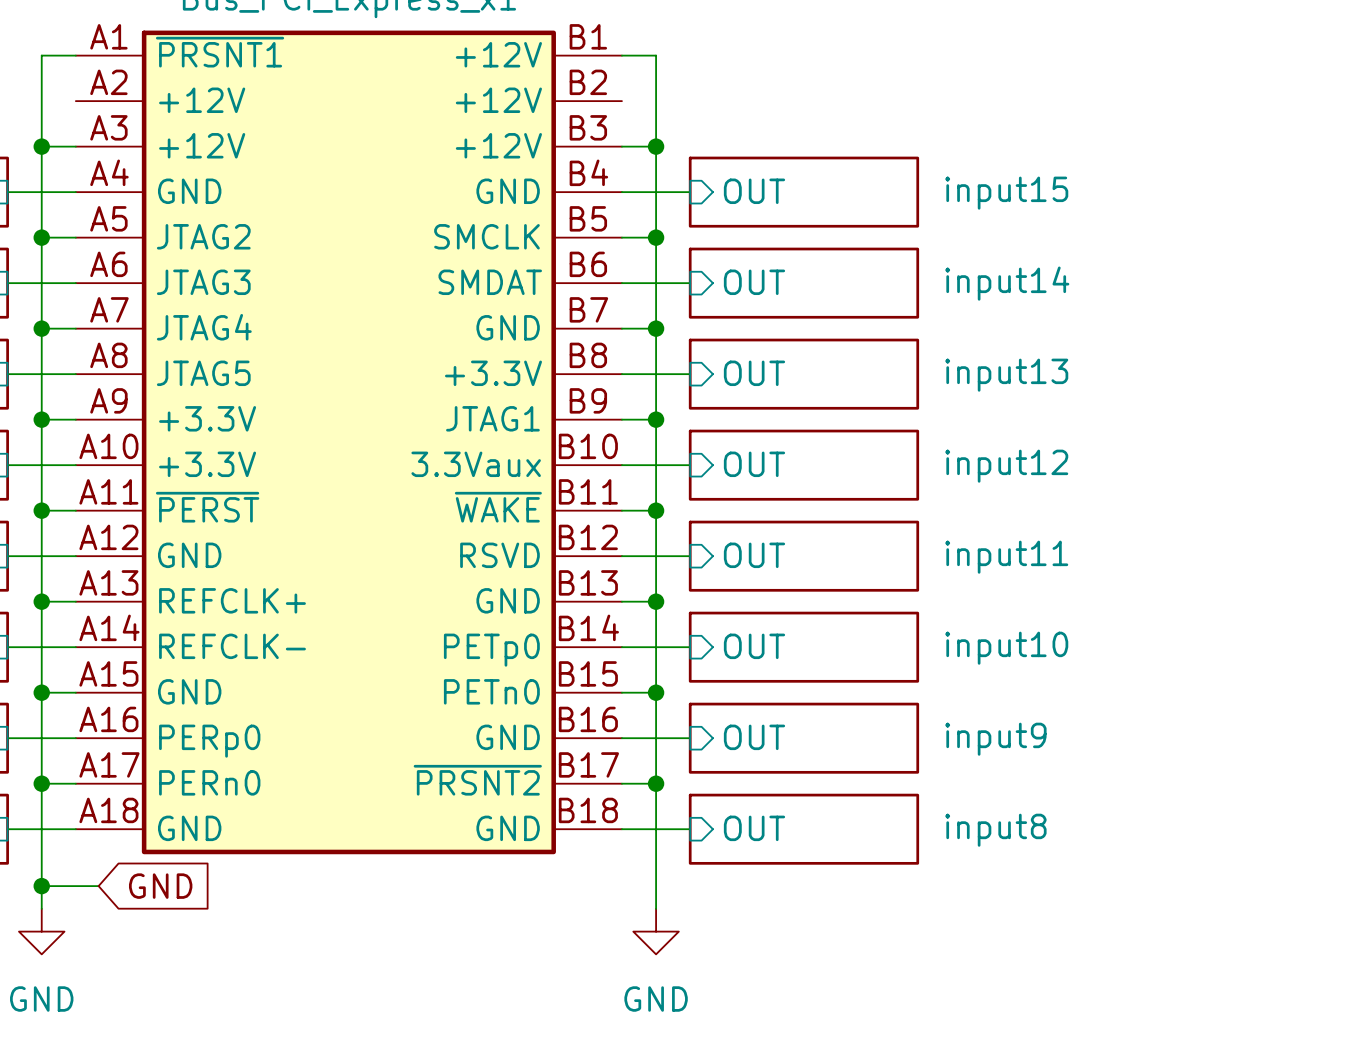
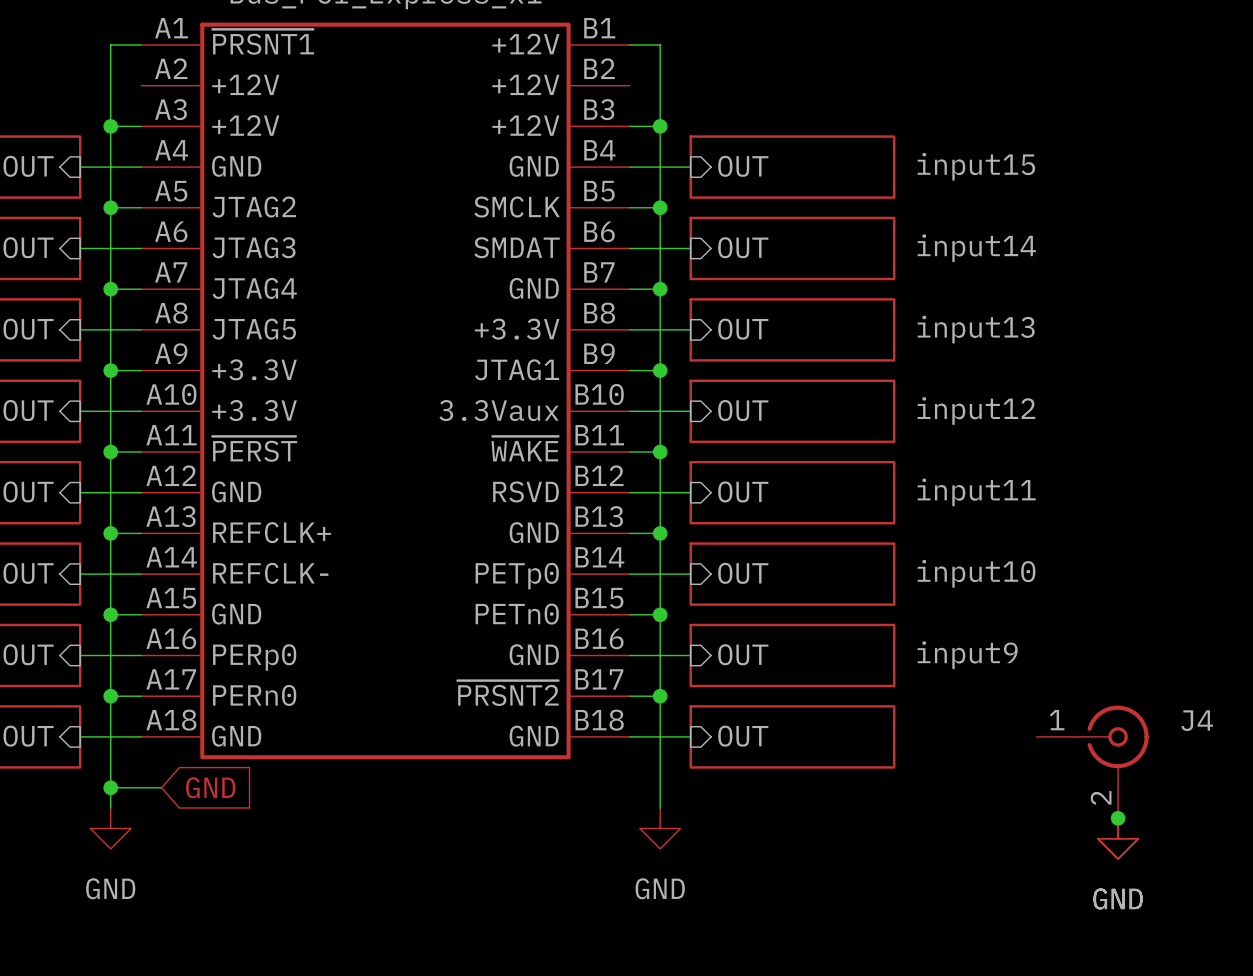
sheet input8 name: input8 (995, 830) -> none
J4: none -> (1092, 761)
junction: none -> (1118, 818)
power symbol: none -> GND (1118, 838)

